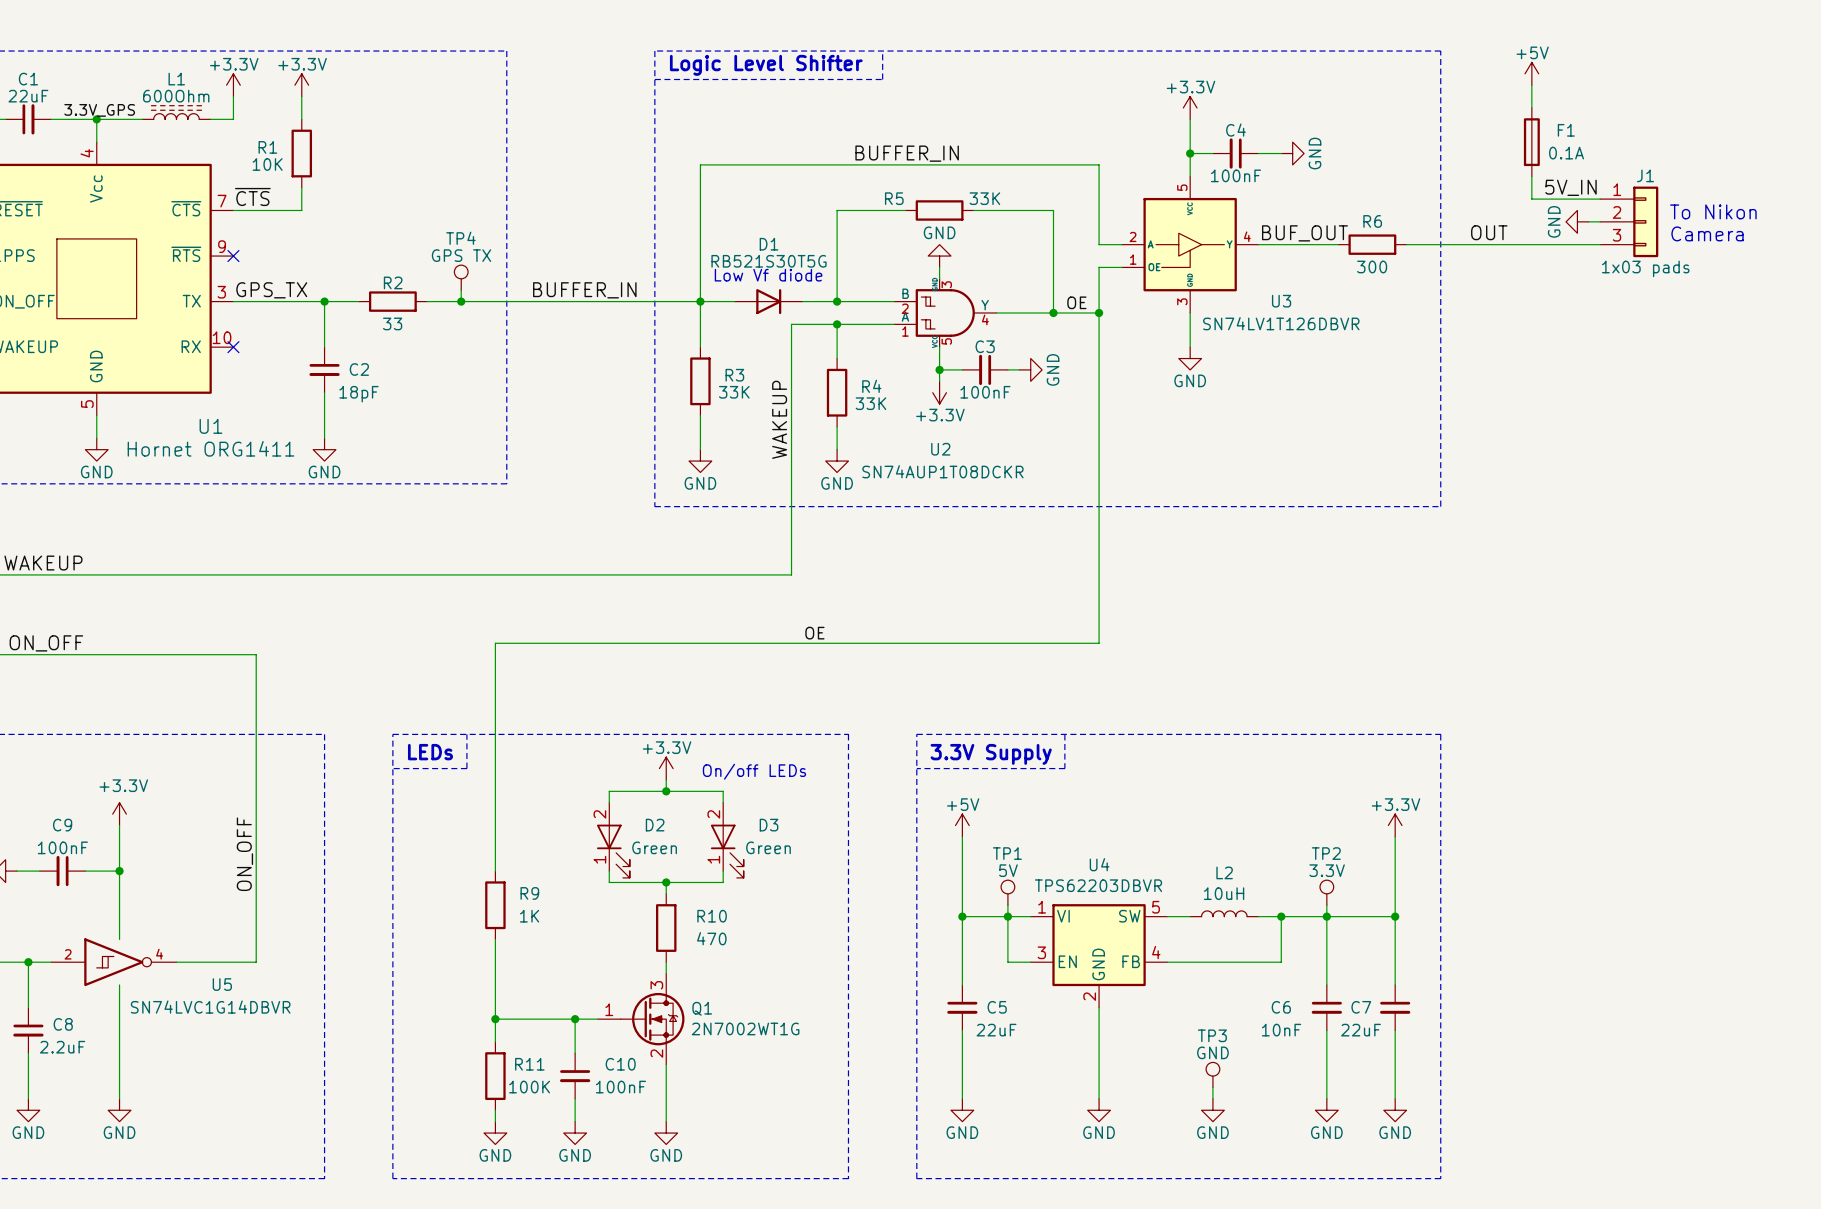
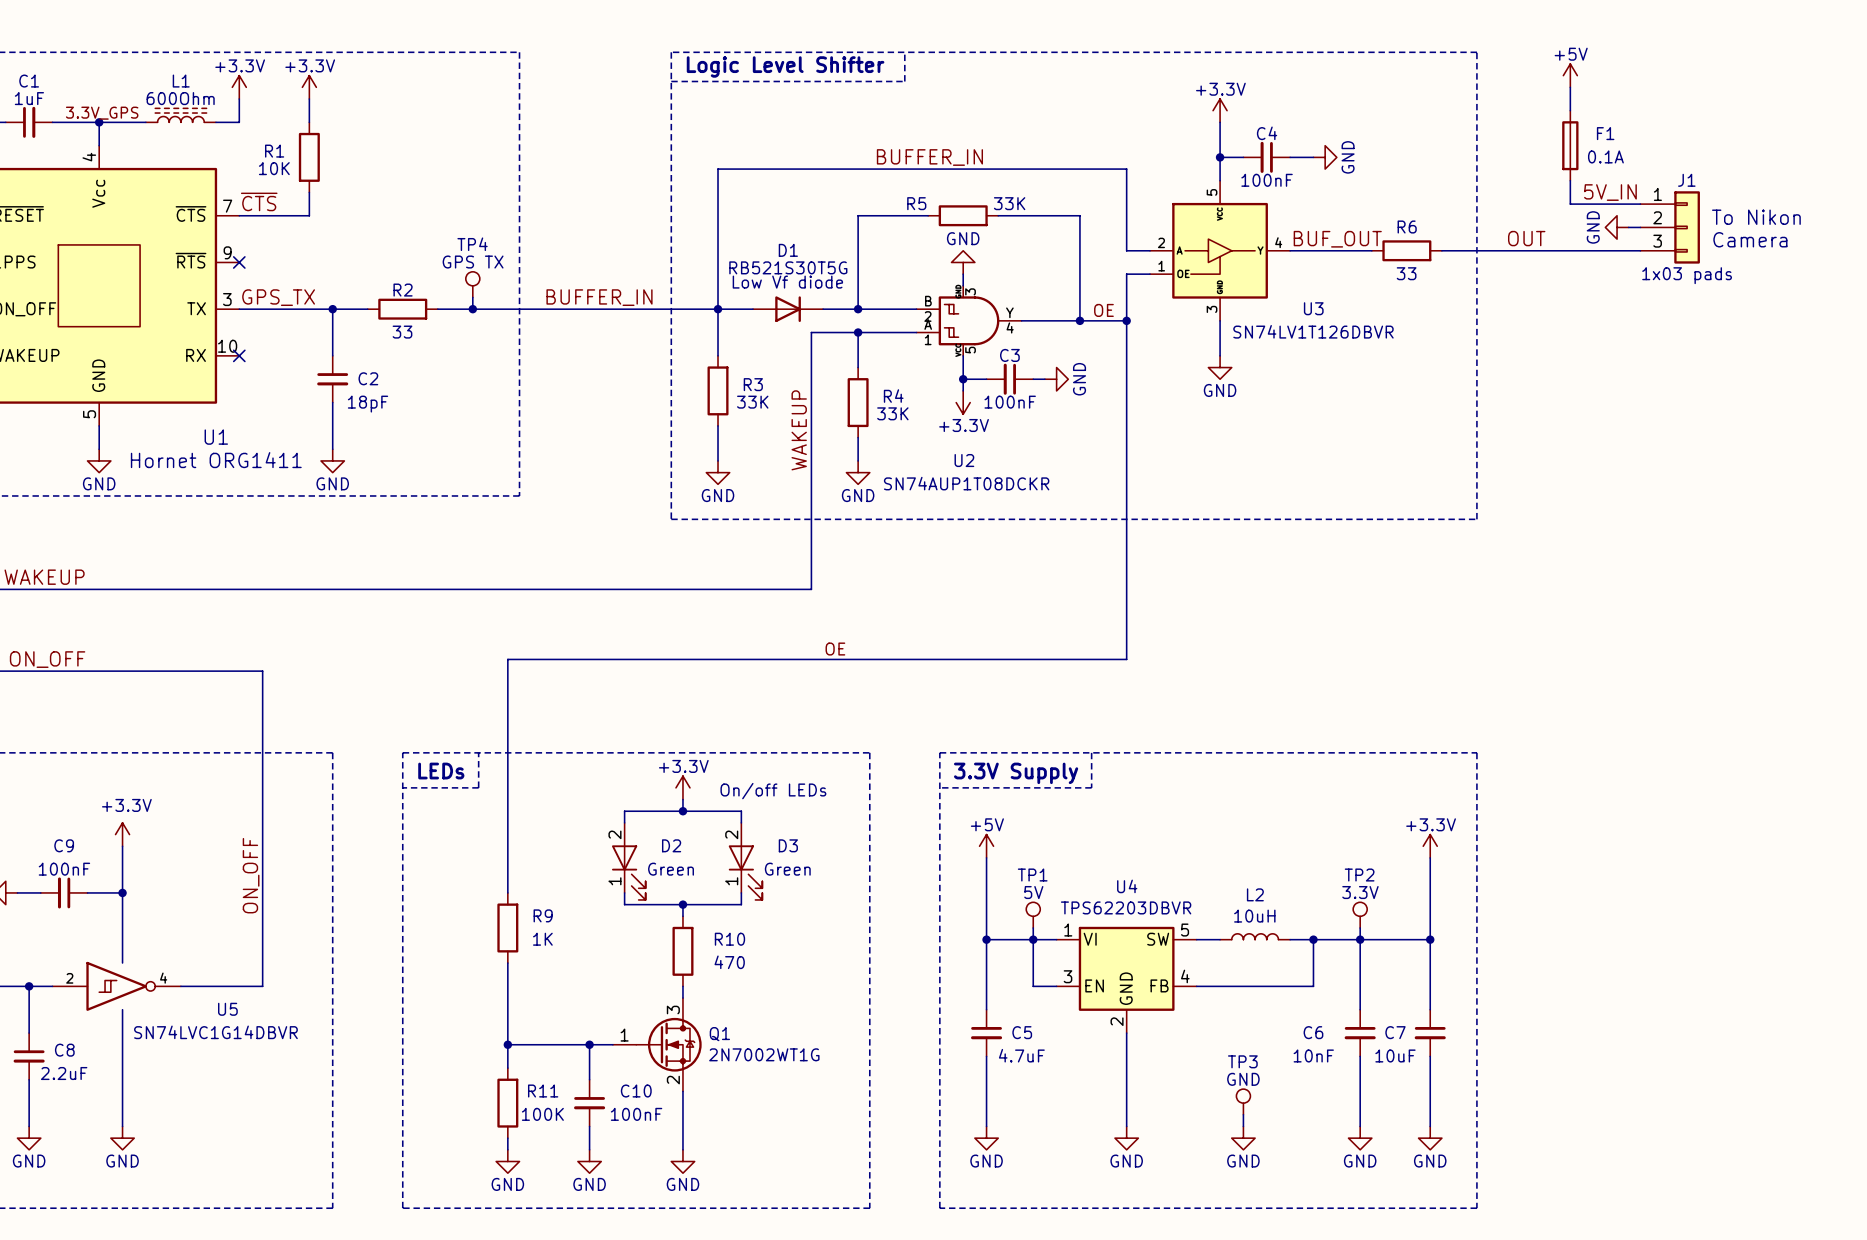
C1 value: 22uF (28, 96) -> 1uF (29, 98)
R6 value: 300 (1372, 267) -> 33 (1406, 273)
C5 value: 22uF (996, 1030) -> 4.7uF (1021, 1055)
C7 value: 22uF (1361, 1030) -> 10uF (1395, 1055)

